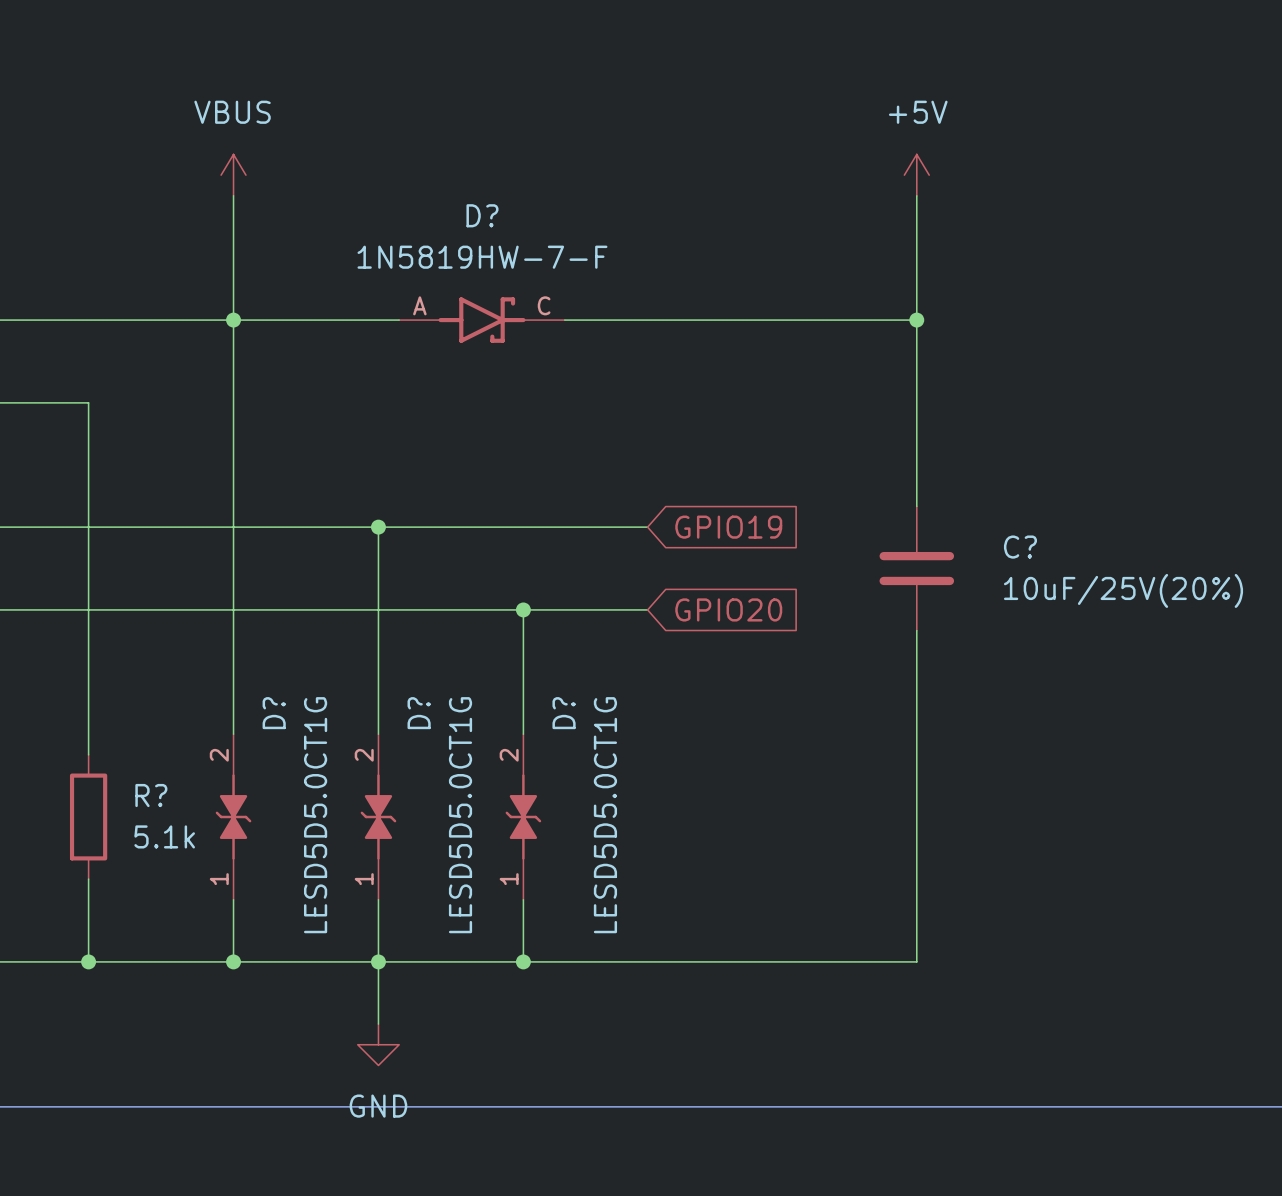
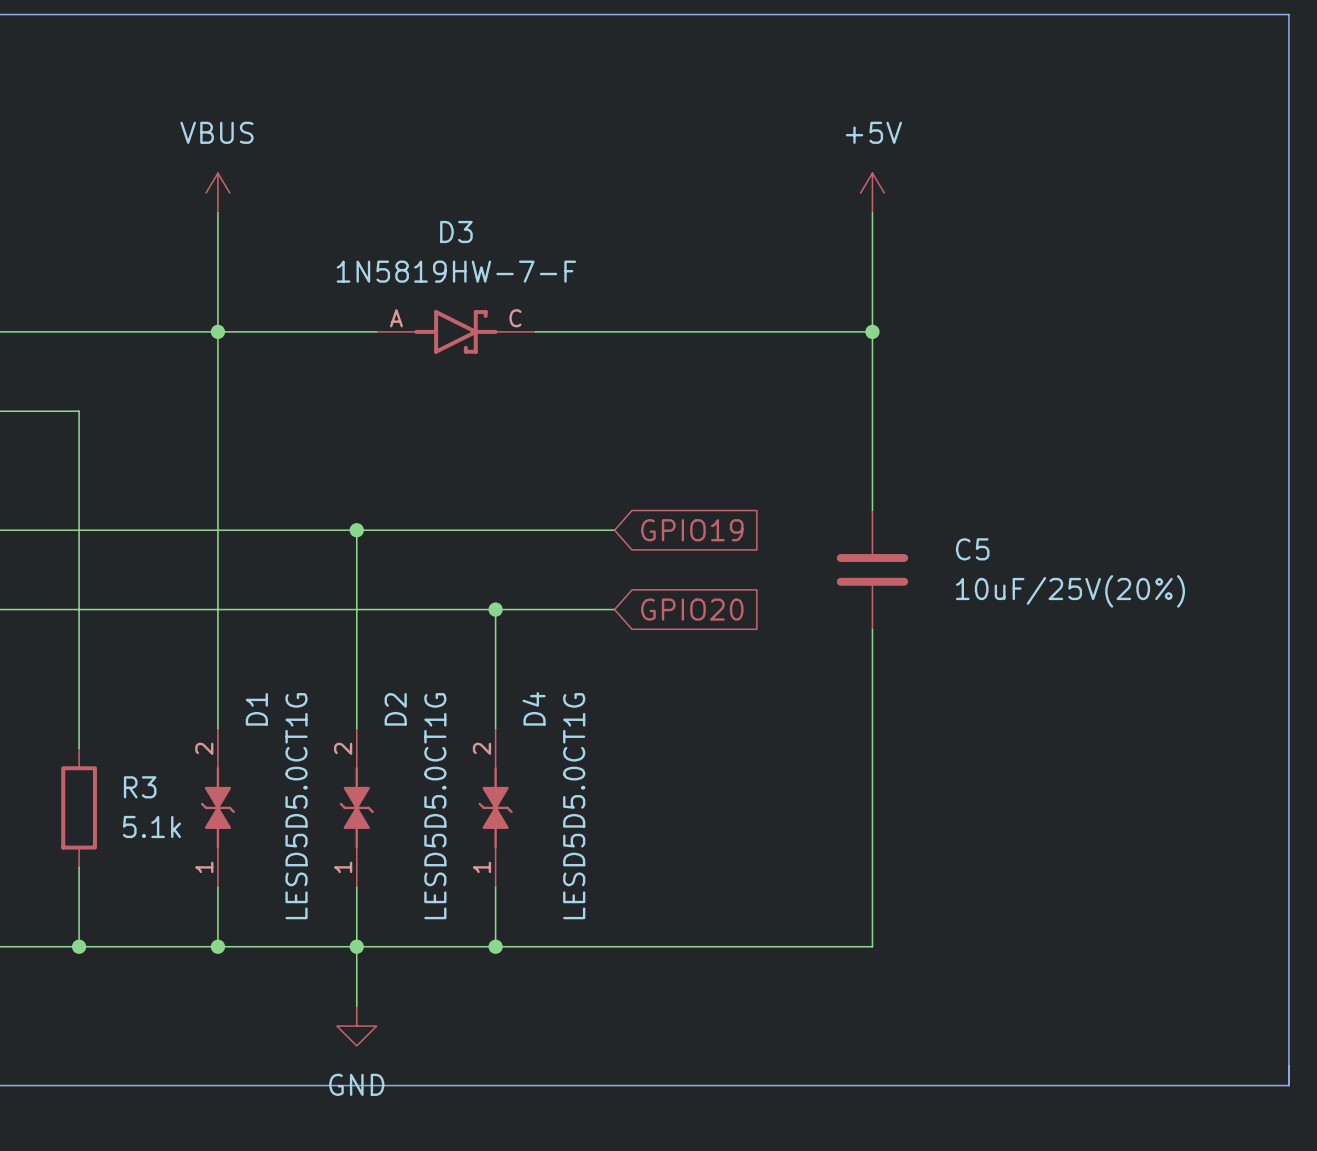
D? name: D? (482, 215) -> D3 (456, 231)
C? name: C? (1020, 547) -> C5 (972, 549)
D? name: D? (274, 713) -> D1 (256, 709)
D? name: D? (419, 713) -> D2 (395, 709)
D? name: D? (564, 713) -> D4 (534, 708)
R? name: R? (151, 795) -> R3 (140, 787)

